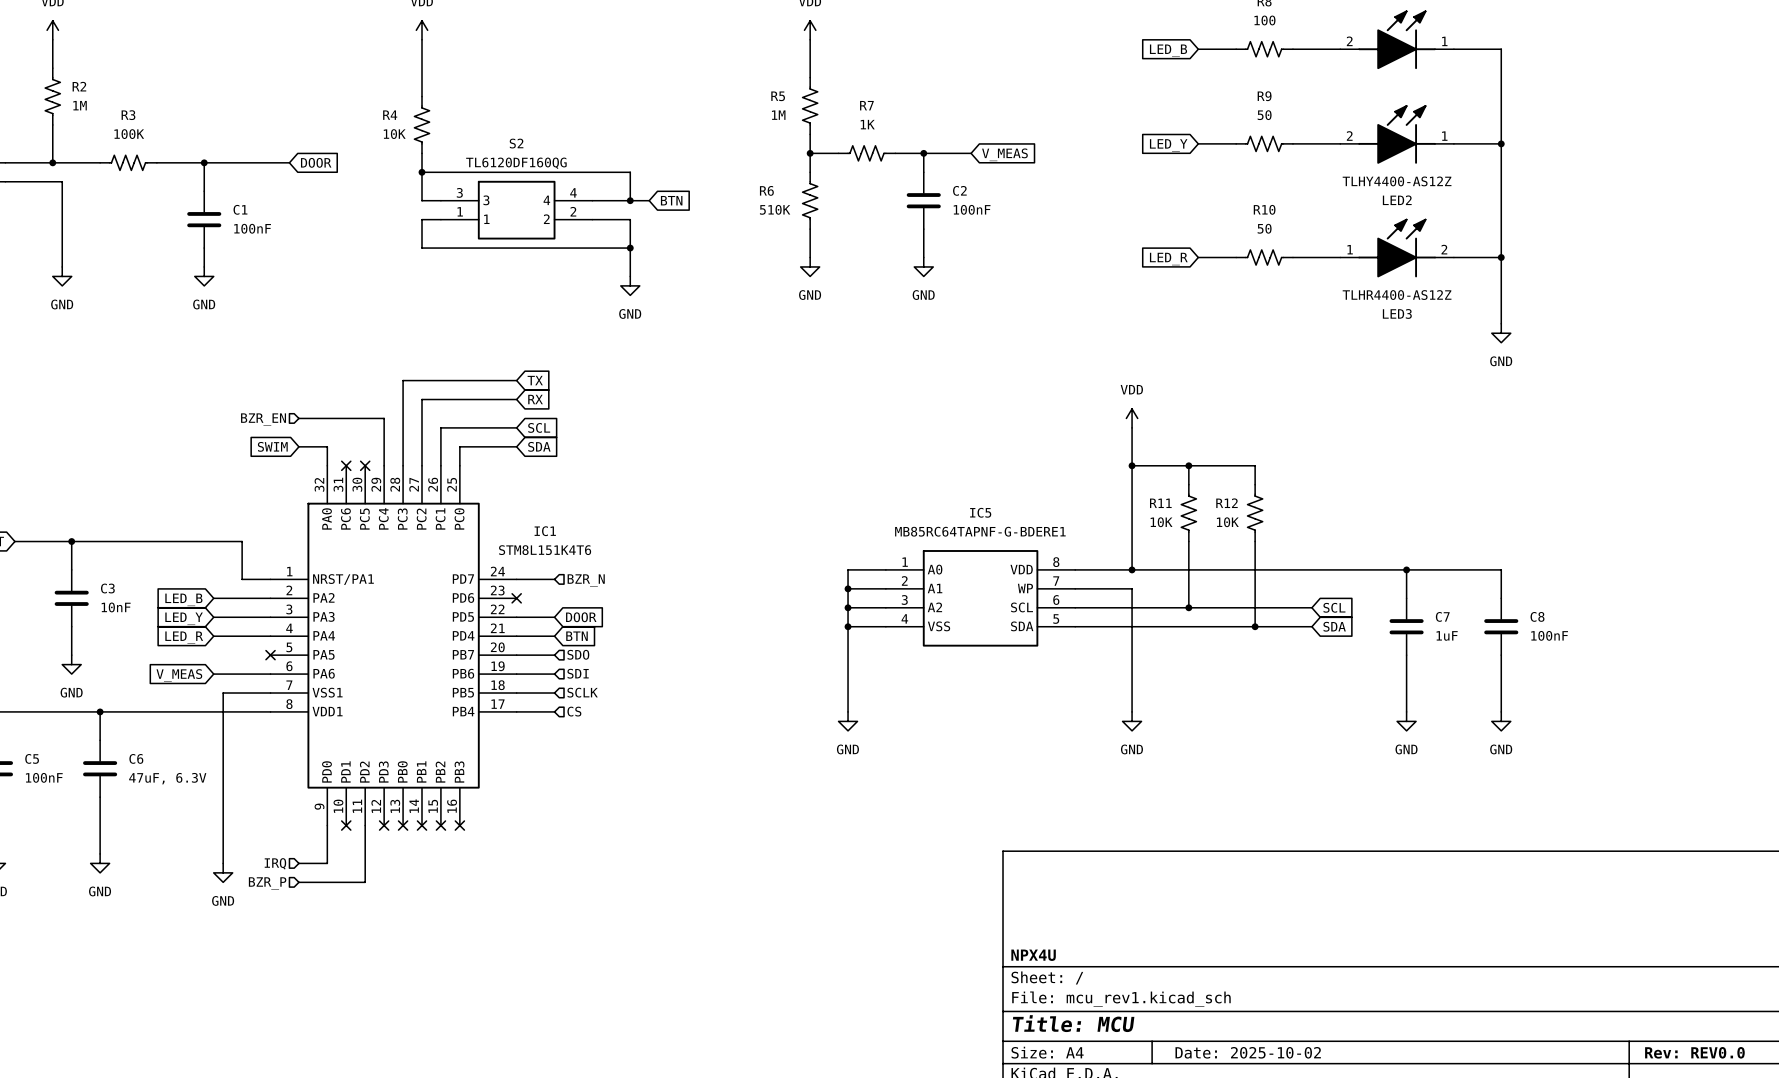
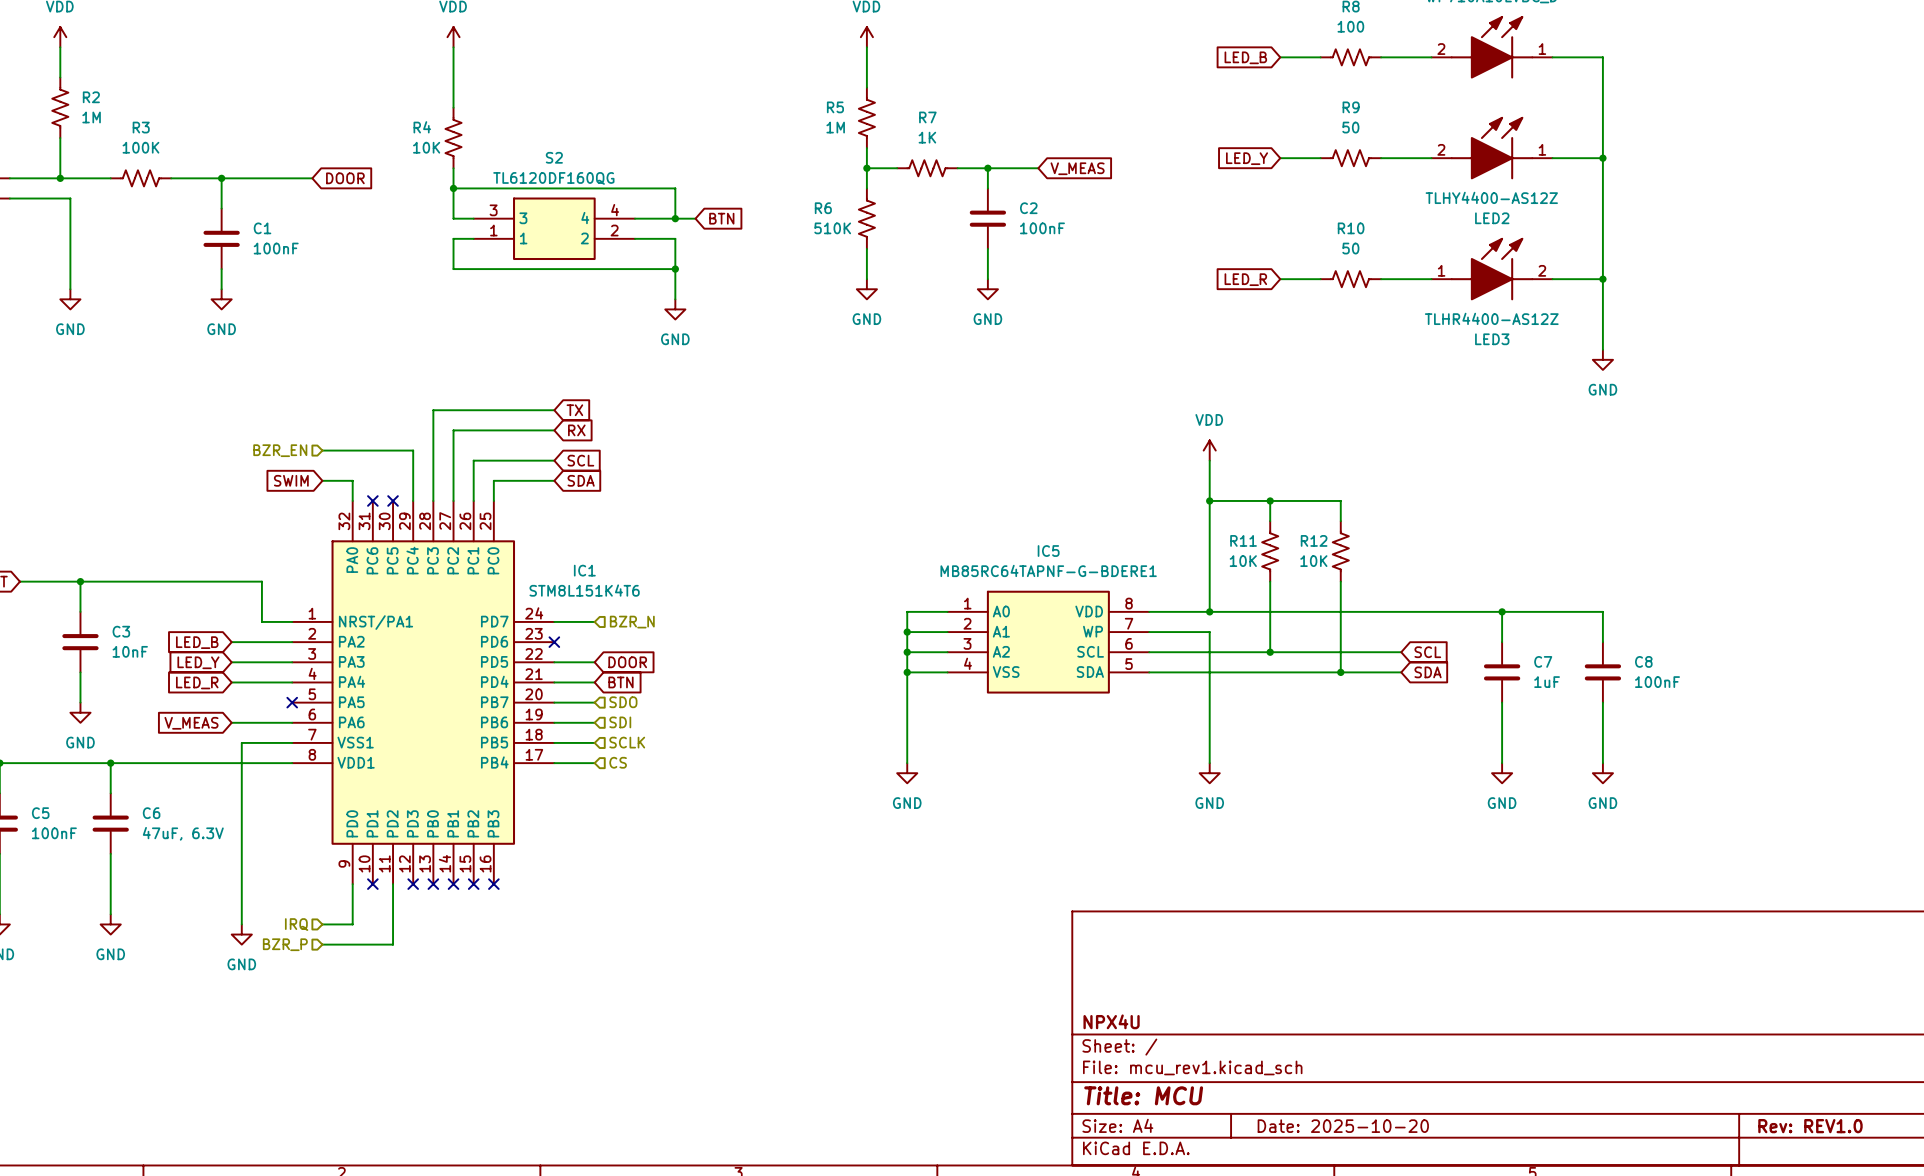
title block: Date: 2025-10-02 (1248, 1052) -> Date: 2025-10-20 (1343, 1126)
title block: Rev: REV0.0 (1694, 1052) -> Rev: REV1.0 (1810, 1126)

